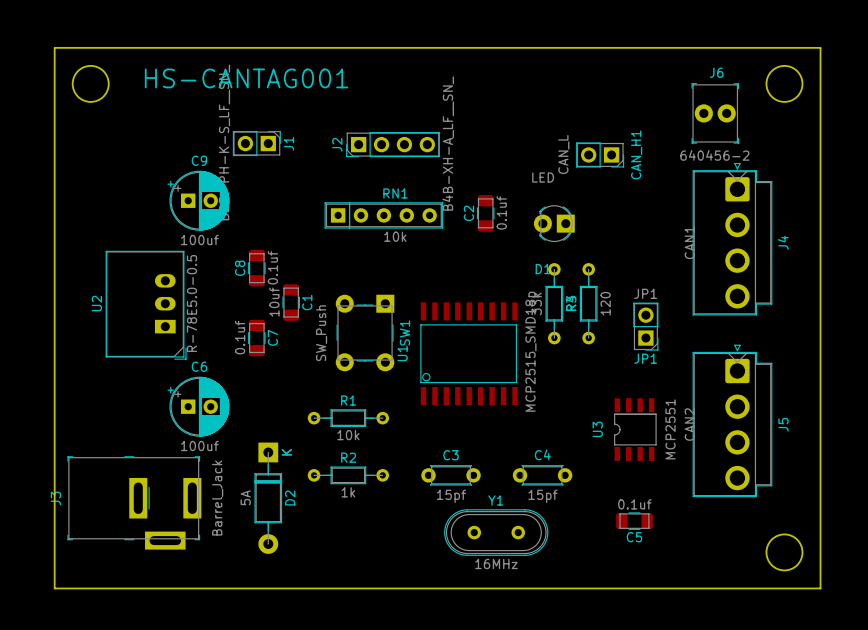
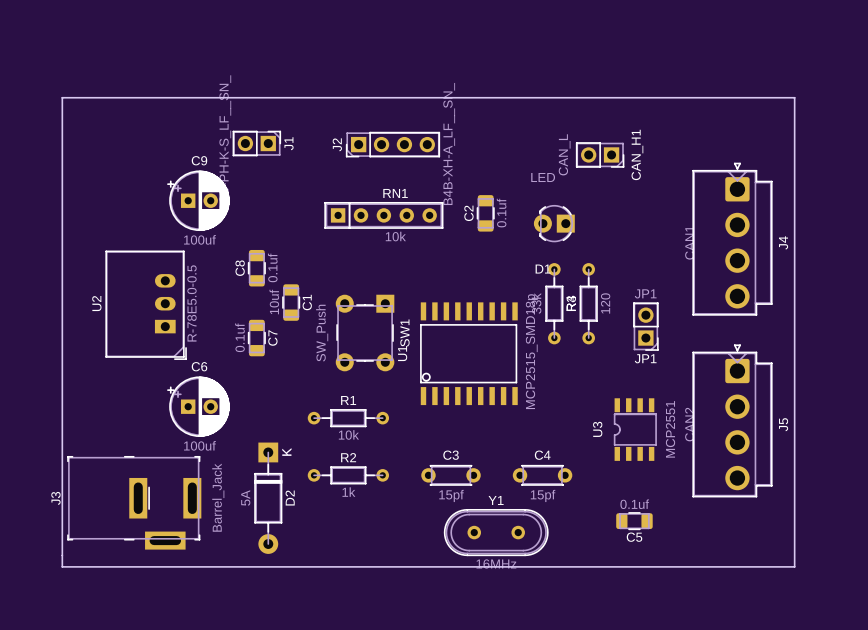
board edge: (54, 47) (54, 588) (820, 588) (820, 47) (54, 47) -> (62, 97) (62, 566) (794, 566) (794, 97) (62, 97)
round board edge: [71, 64, 110, 103] -> none
round board edge: [765, 64, 804, 103] -> none
text: HS-CANTAG001 (246, 78) -> none
J6: 640456-2 (715, 113) -> none
round board edge: [765, 533, 804, 572] -> none

